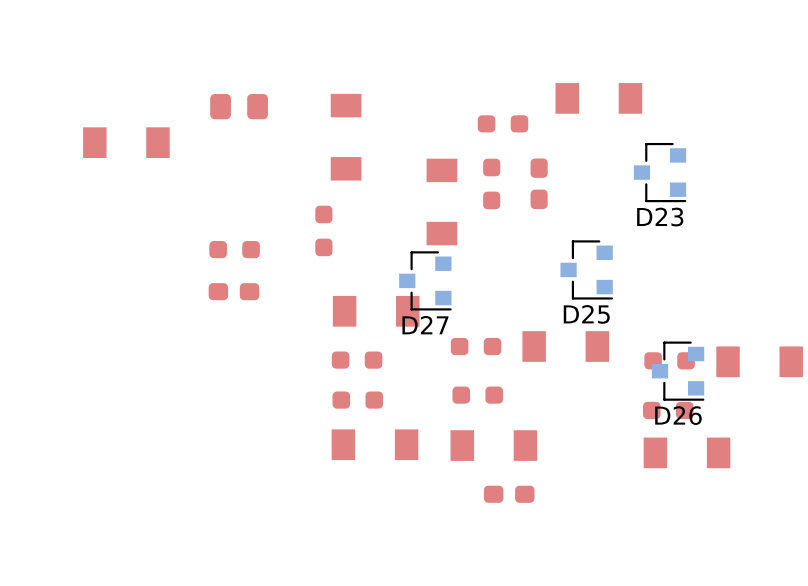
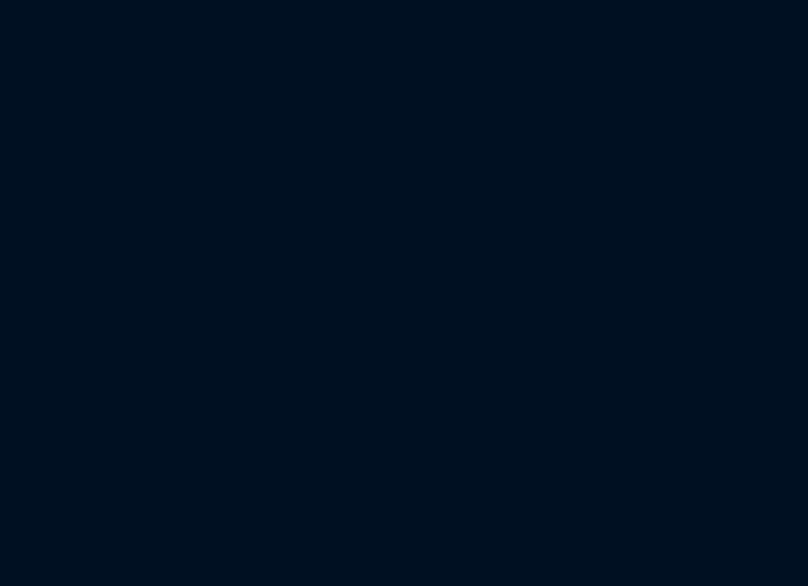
part: (598, 98) -> none
part: (239, 106) -> none
part: (503, 123) -> none
part: (346, 137) -> none
part: (126, 142) -> none
D23: (660, 172) -> none
part: (491, 183) -> none
part: (539, 183) -> none
part: (441, 201) -> none
part: (323, 230) -> none
part: (234, 249) -> none
D25: (586, 269) -> none
D27: (425, 280) -> none
part: (233, 291) -> none
part: (376, 311) -> none
part: (476, 346) -> none
part: (565, 346) -> none
part: (357, 360) -> none
part: (669, 360) -> none
part: (759, 361) -> none
D26: (678, 371) -> none
part: (477, 395) -> none
part: (357, 400) -> none
part: (668, 410) -> none
part: (374, 444) -> none
part: (493, 445) -> none
part: (686, 452) -> none
part: (509, 494) -> none

